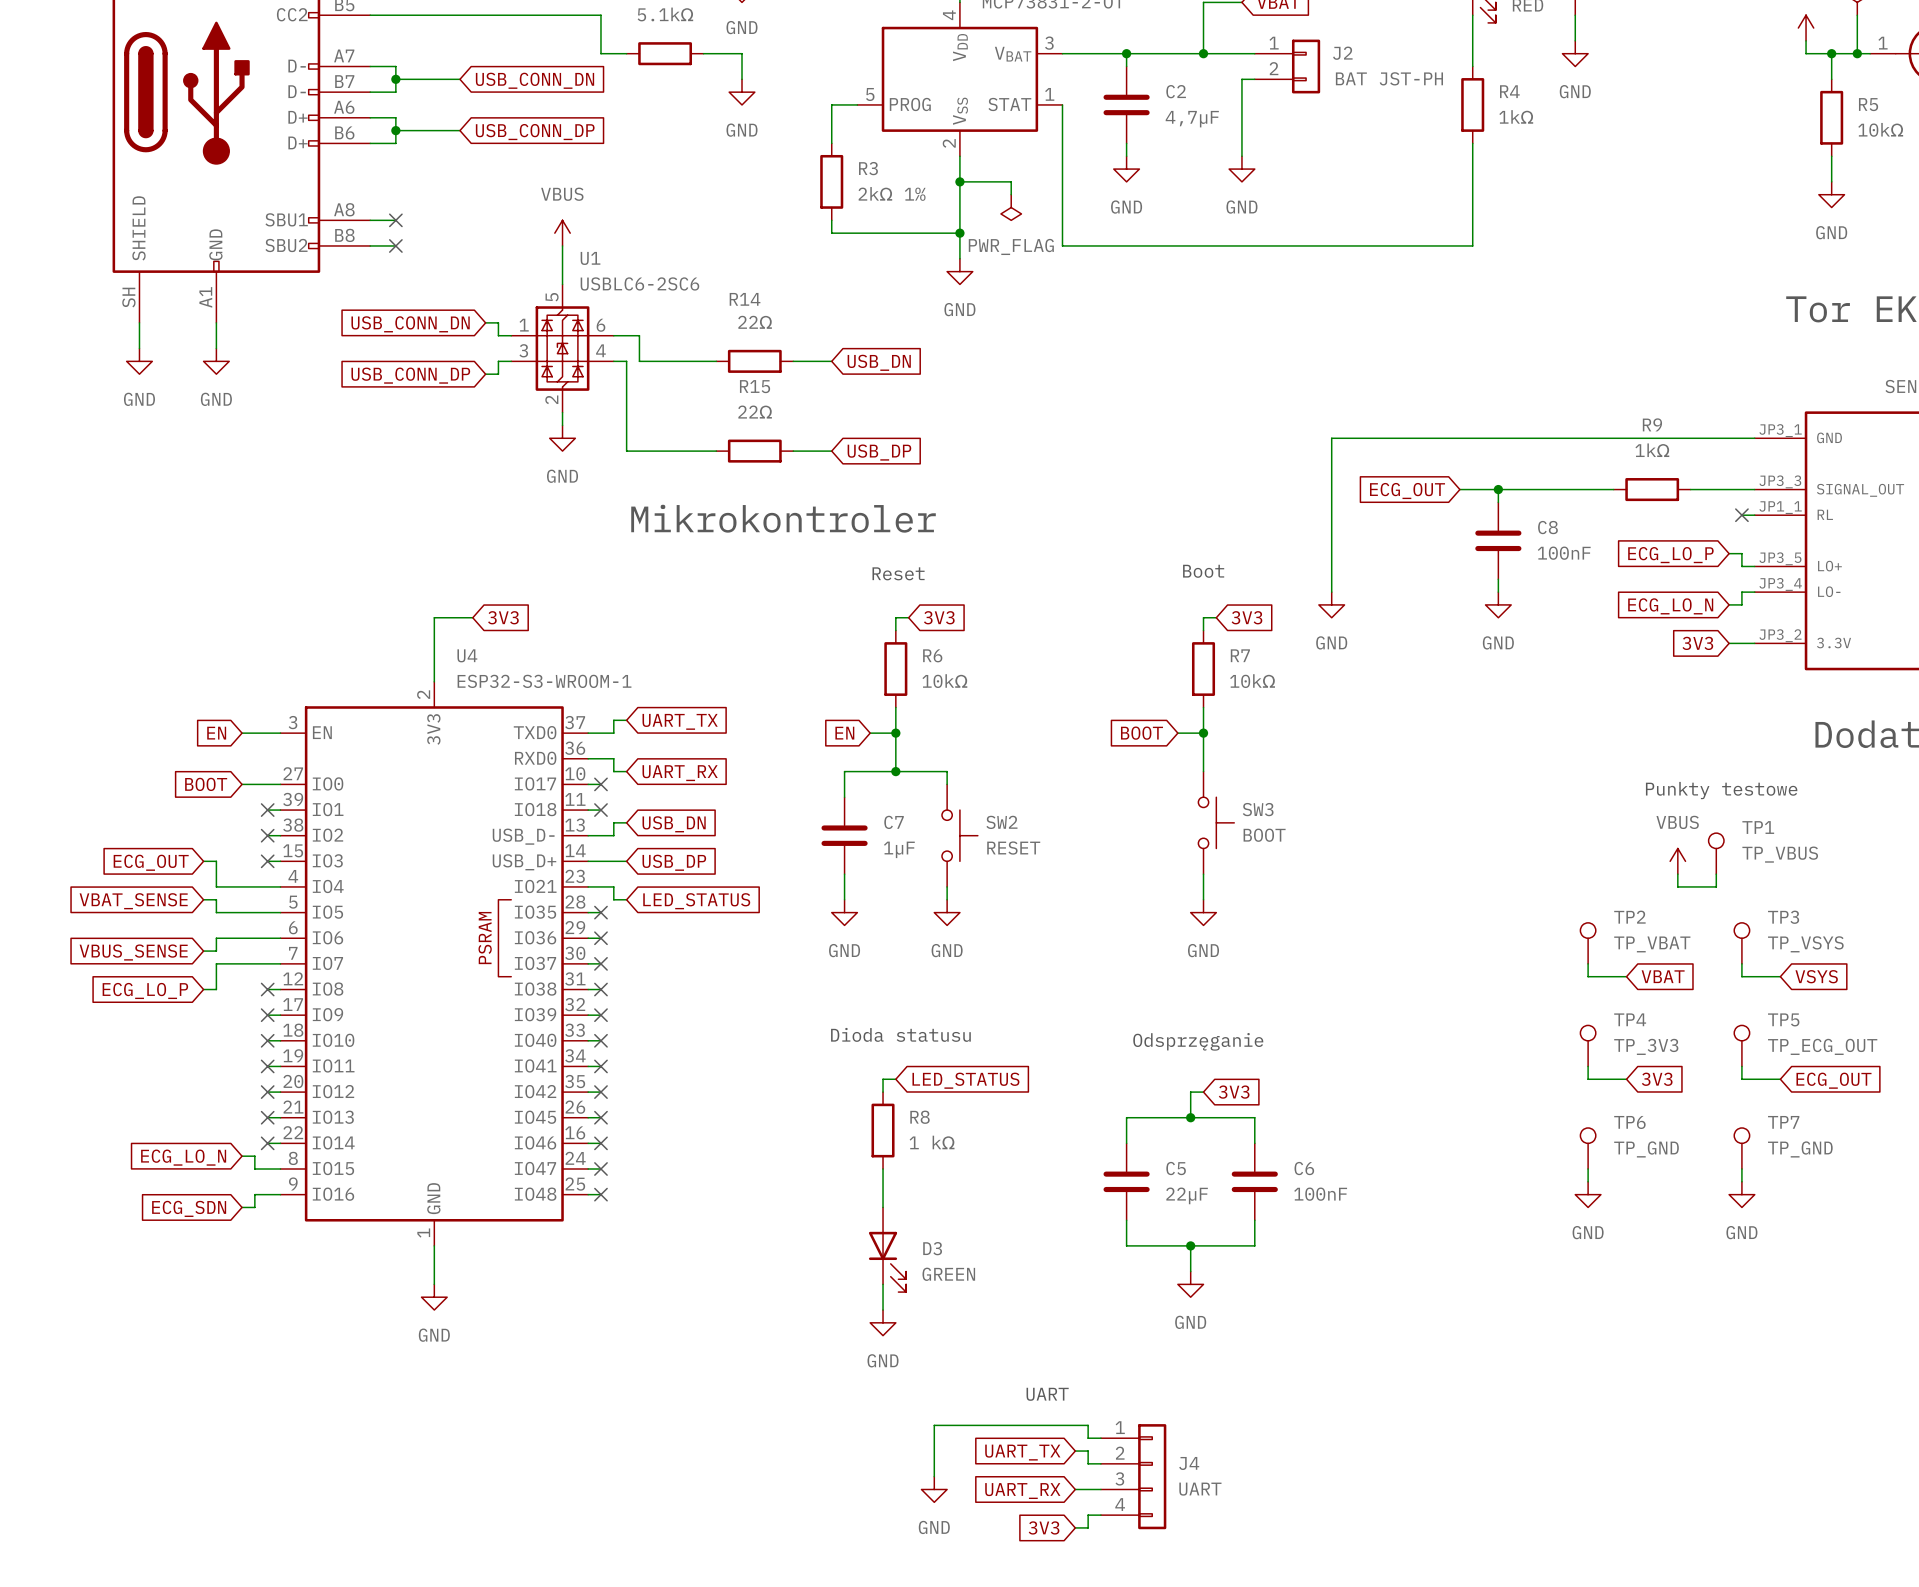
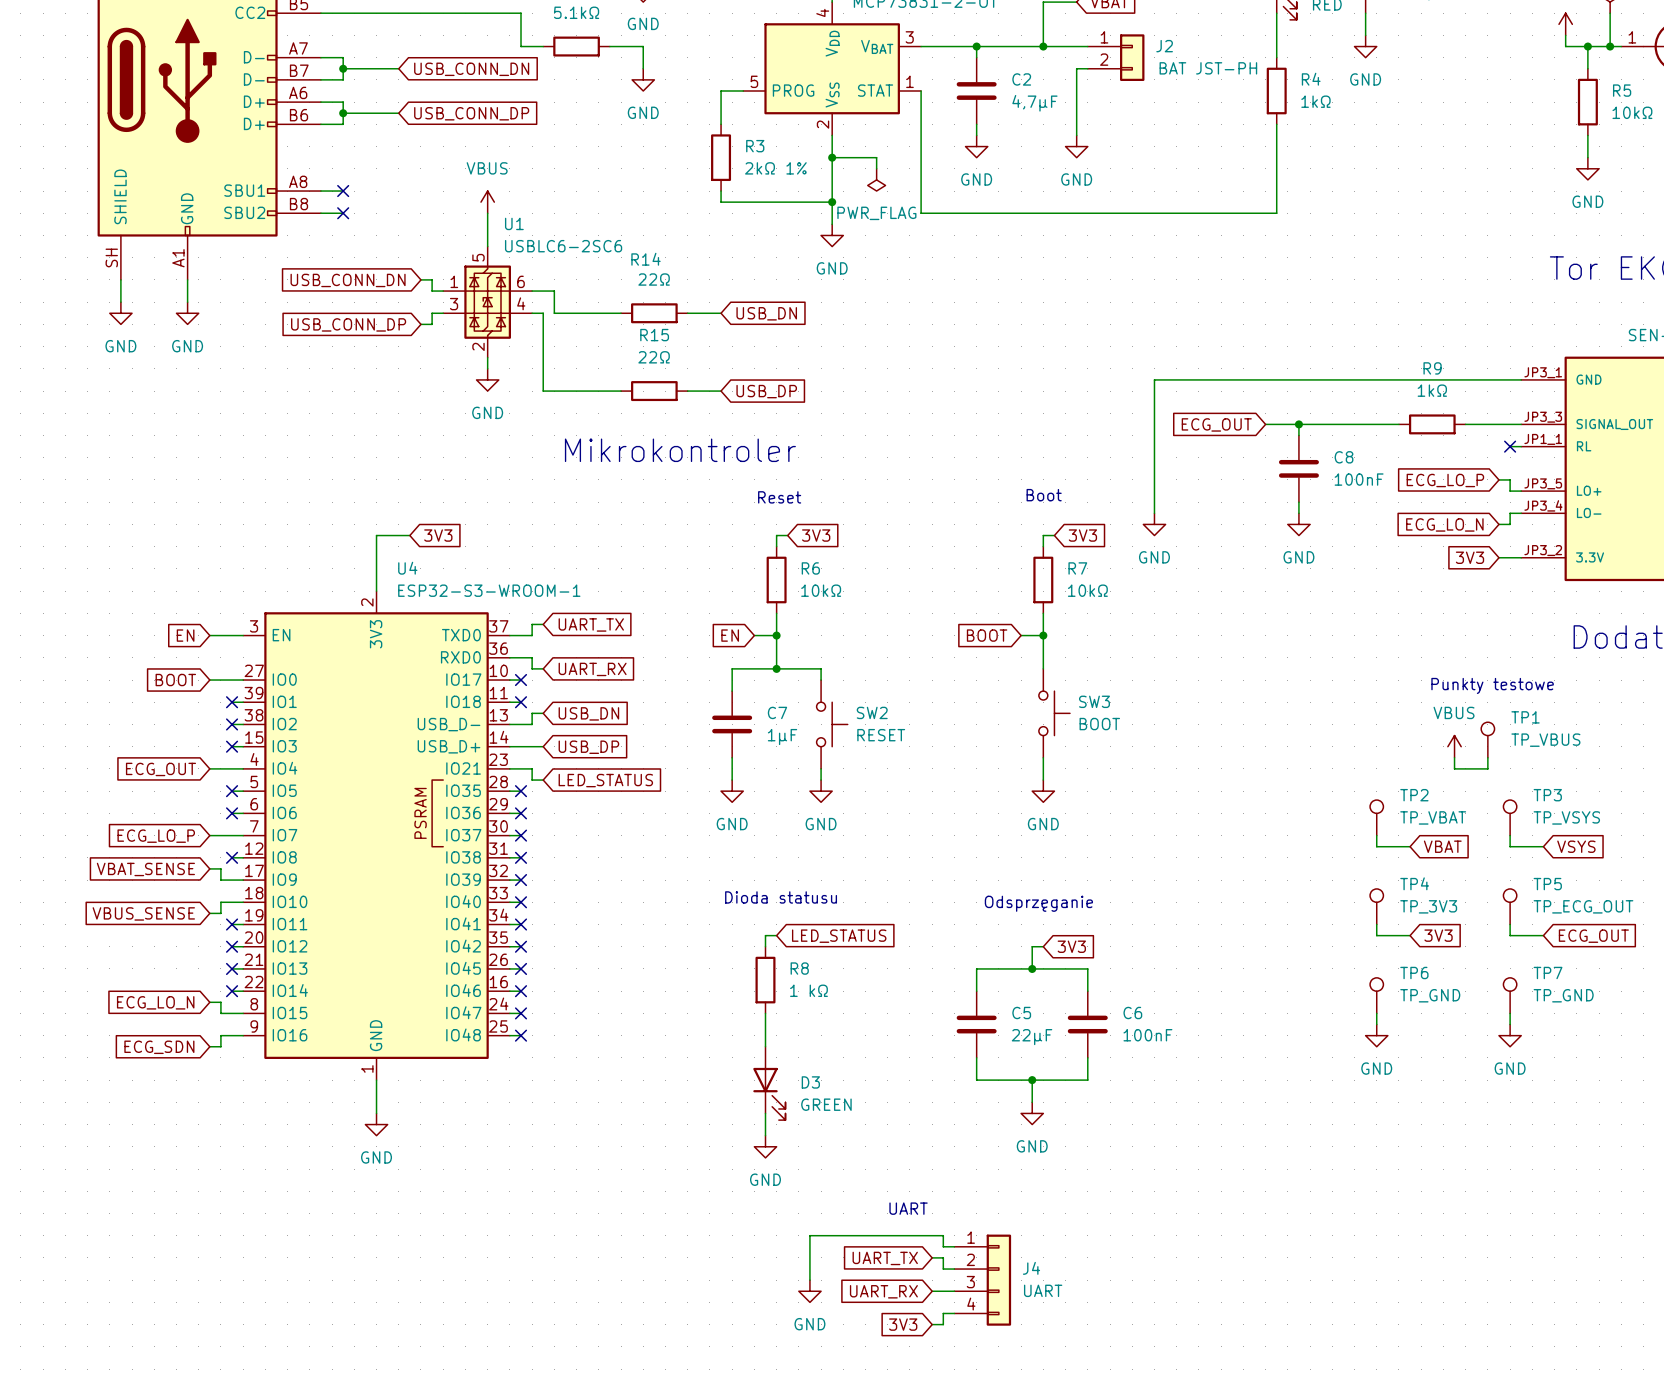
wire: (203, 861) (216, 861) (216, 886) (242, 886) -> none
global label position: ECG_OUT (151, 862) -> ECG_OUT (160, 769)
wire: (203, 899) (216, 899) (216, 912) (267, 912) -> none
global label position: VBAT_SENSE (133, 901) -> VBAT_SENSE (145, 869)
no-connect mark: none -> (232, 791)
wire: (267, 938) (216, 938) (216, 951) (203, 951) -> none
no-connect mark: none -> (232, 813)
global label position: VBUS_SENSE (133, 952) -> VBUS_SENSE (143, 913)
wire: (242, 963) (216, 963) (216, 989) (203, 989) -> none
global label position: ECG_LO_P (145, 990) -> ECG_LO_P (156, 836)
wire: none -> (209, 868) (220, 868) (220, 880) (232, 880)
no-connect mark: (267, 1015) -> none
wire: none -> (232, 902) (220, 902) (220, 913) (209, 913)
no-connect mark: (267, 1040) -> none

